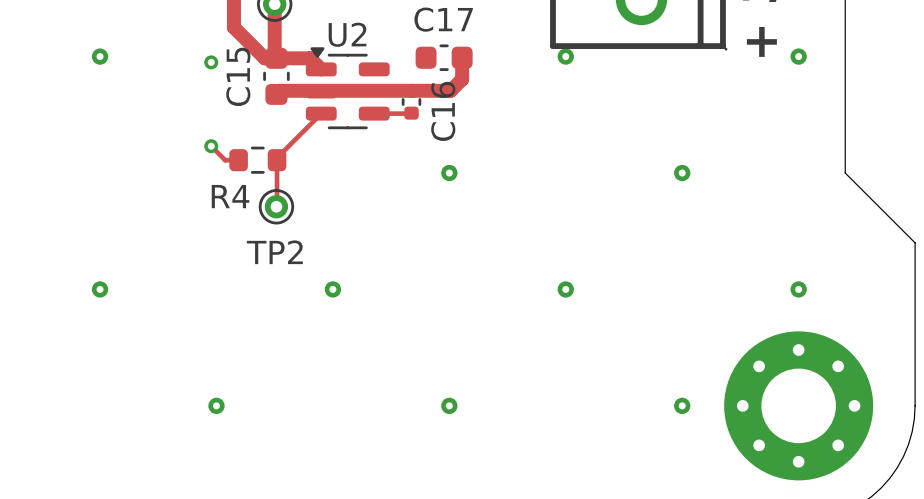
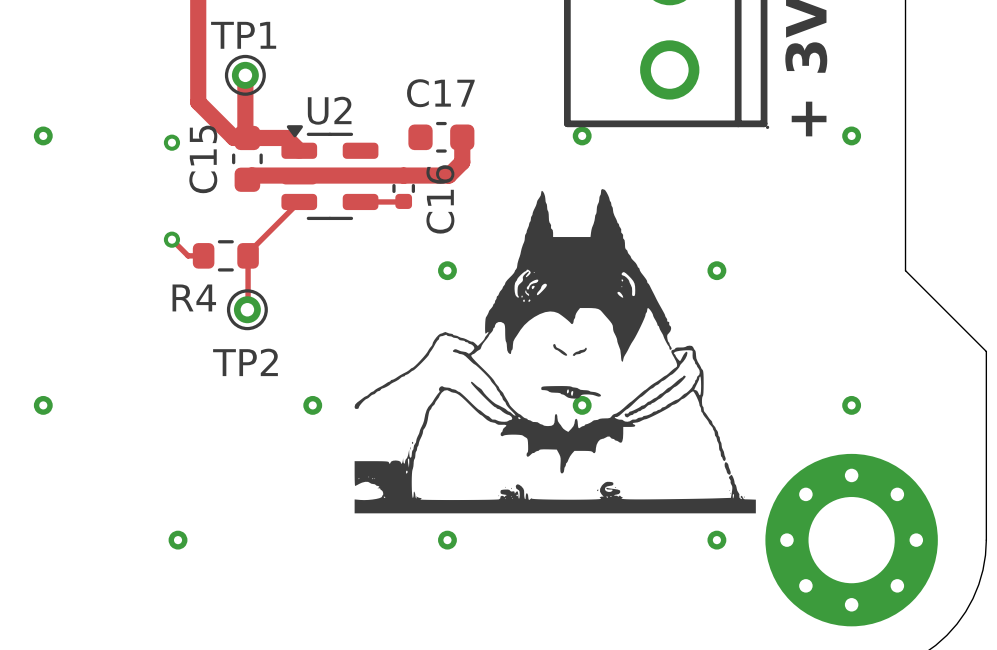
drawing: none -> [354, 189, 756, 514]

